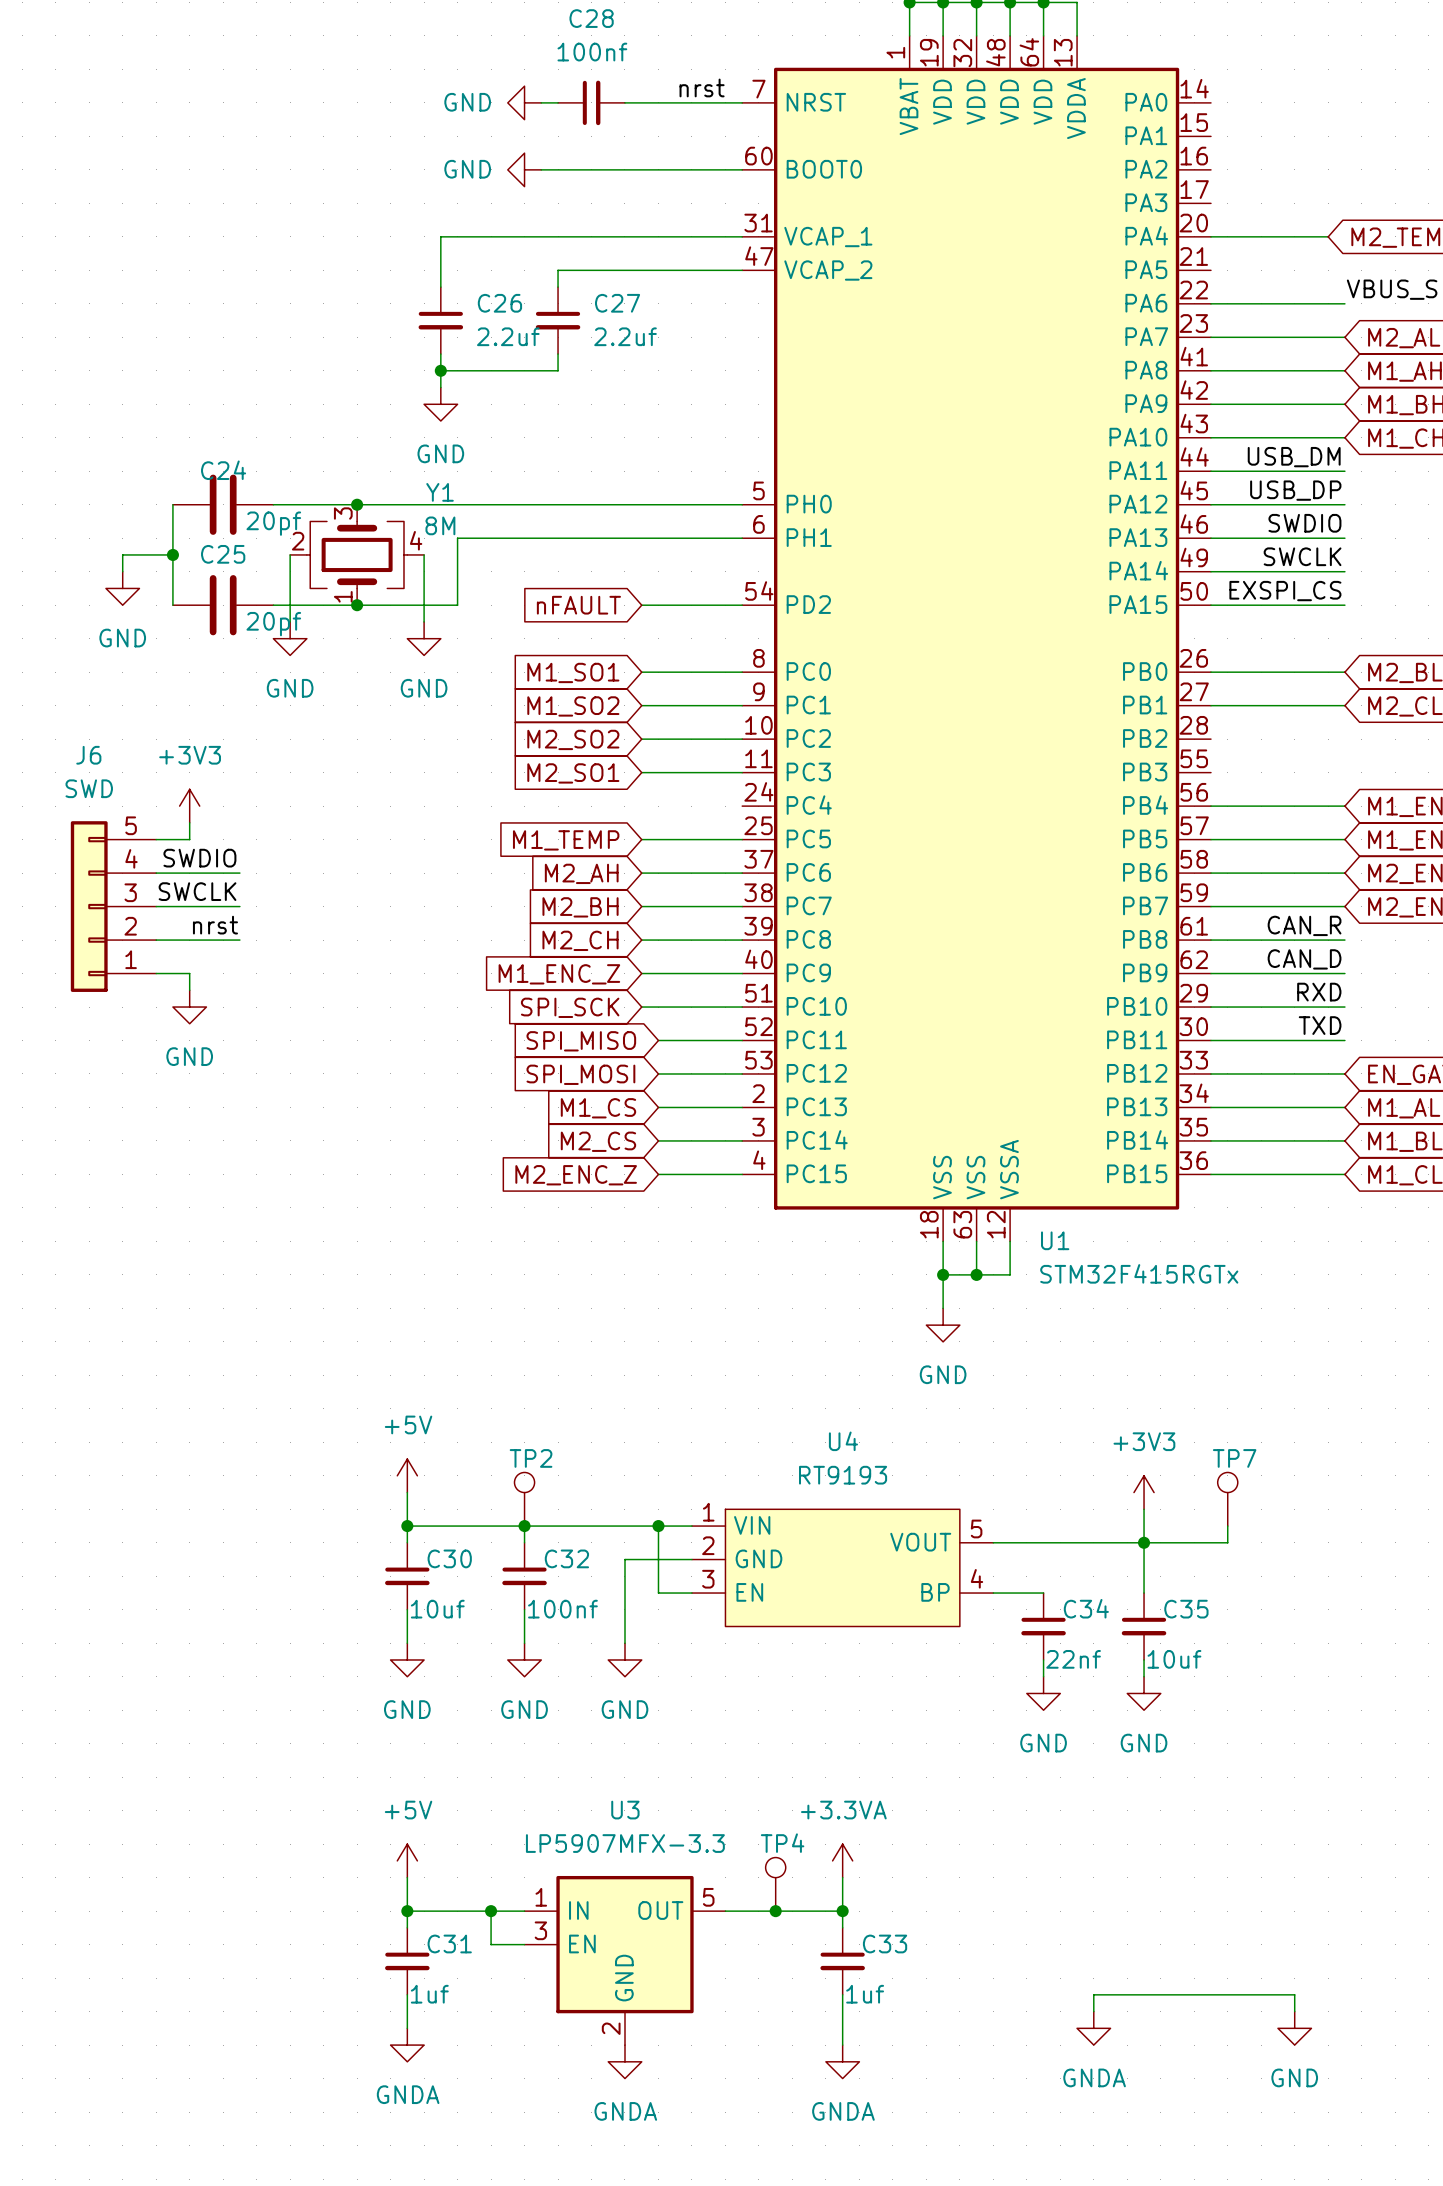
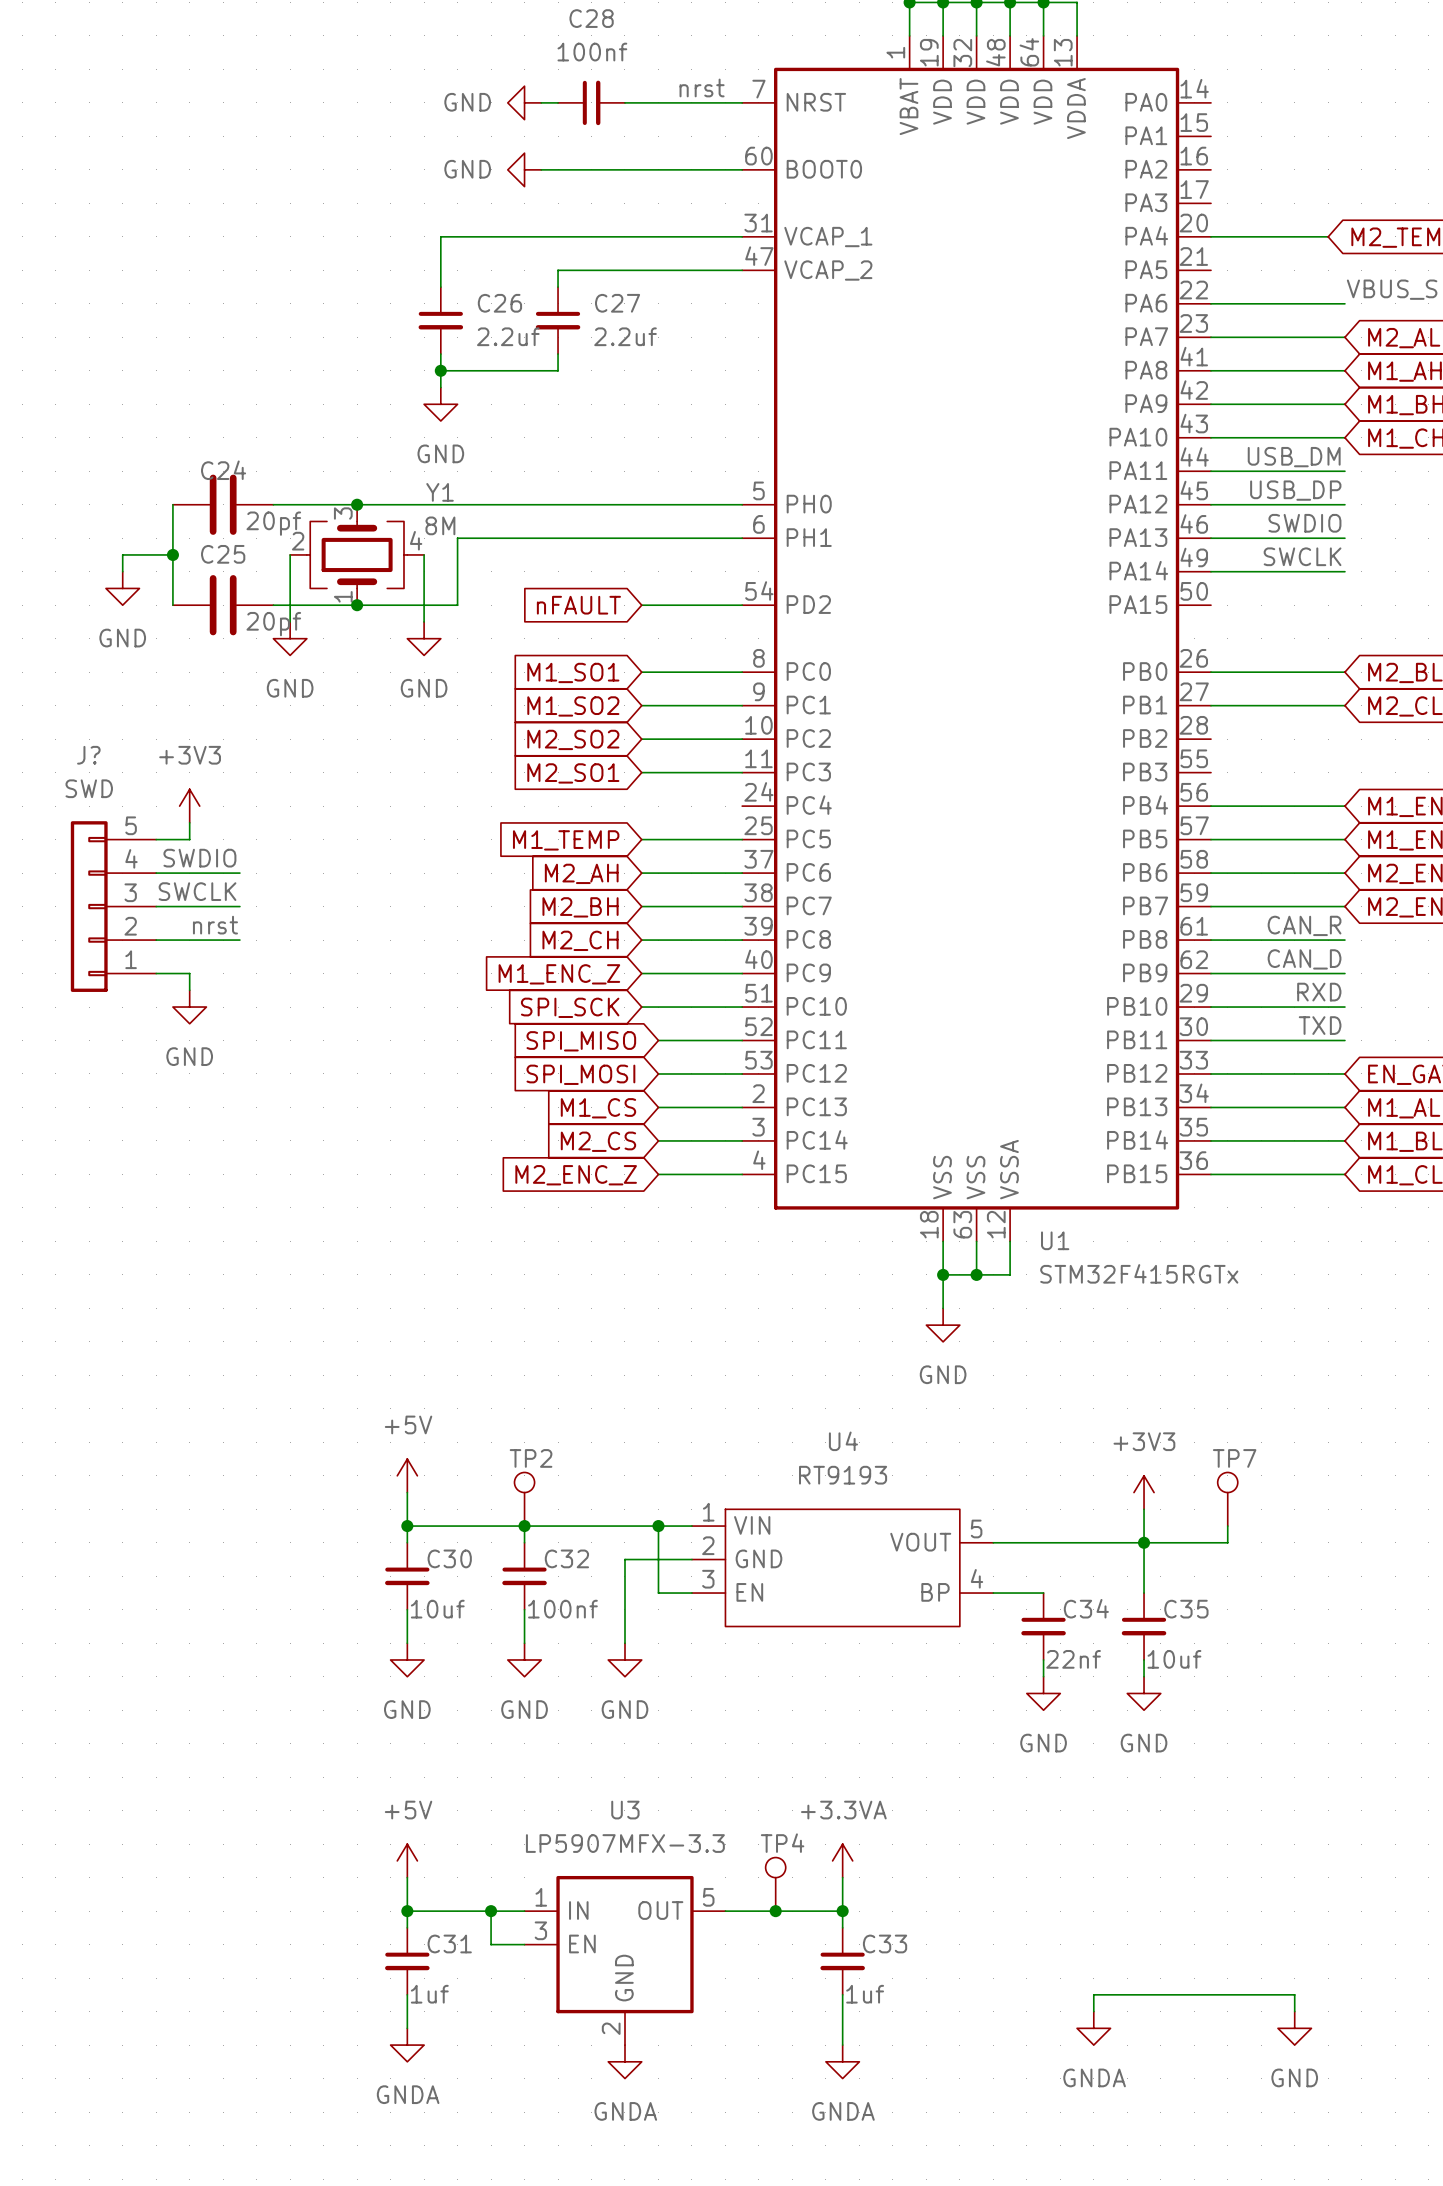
label: EXSPI_CS (1285, 591) -> none
wire: (1210, 605) (1344, 605) -> none
J6 name: J6 (88, 755) -> J? (88, 755)

